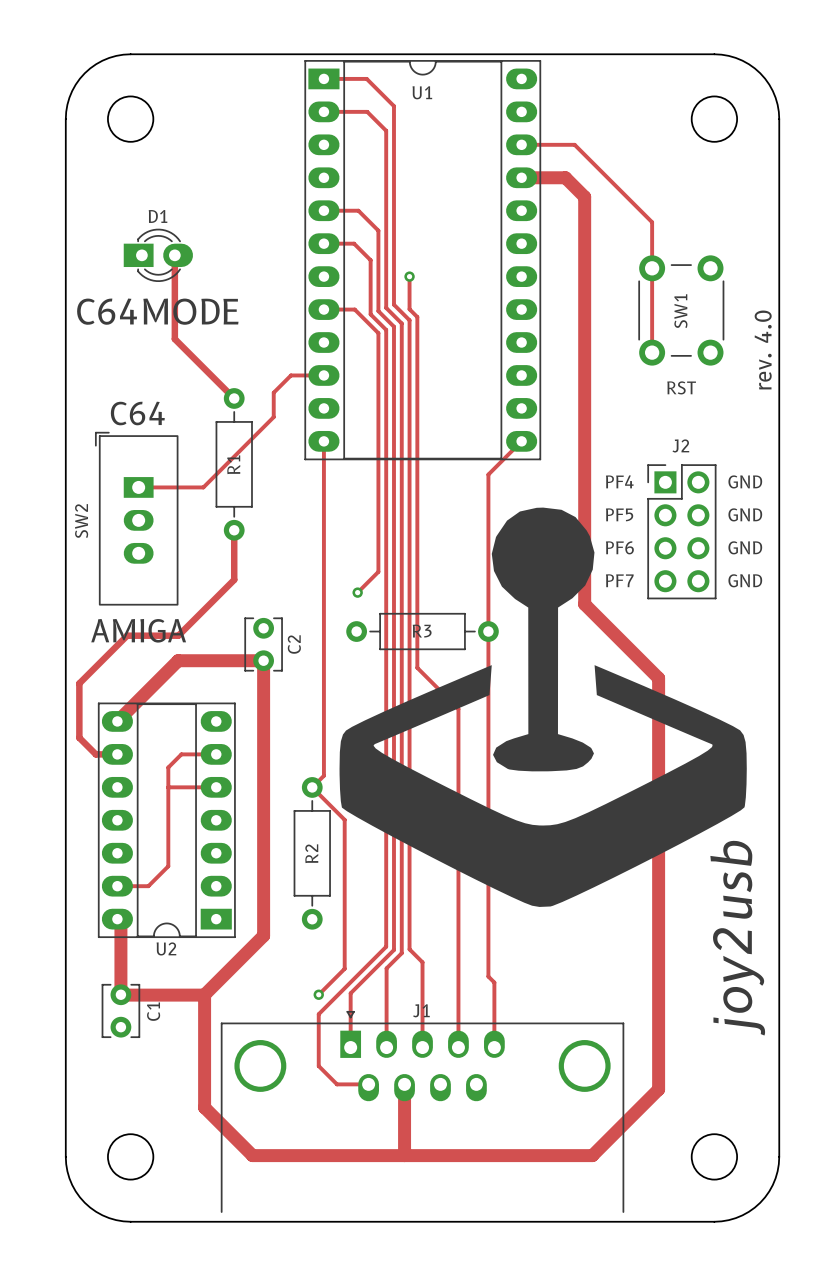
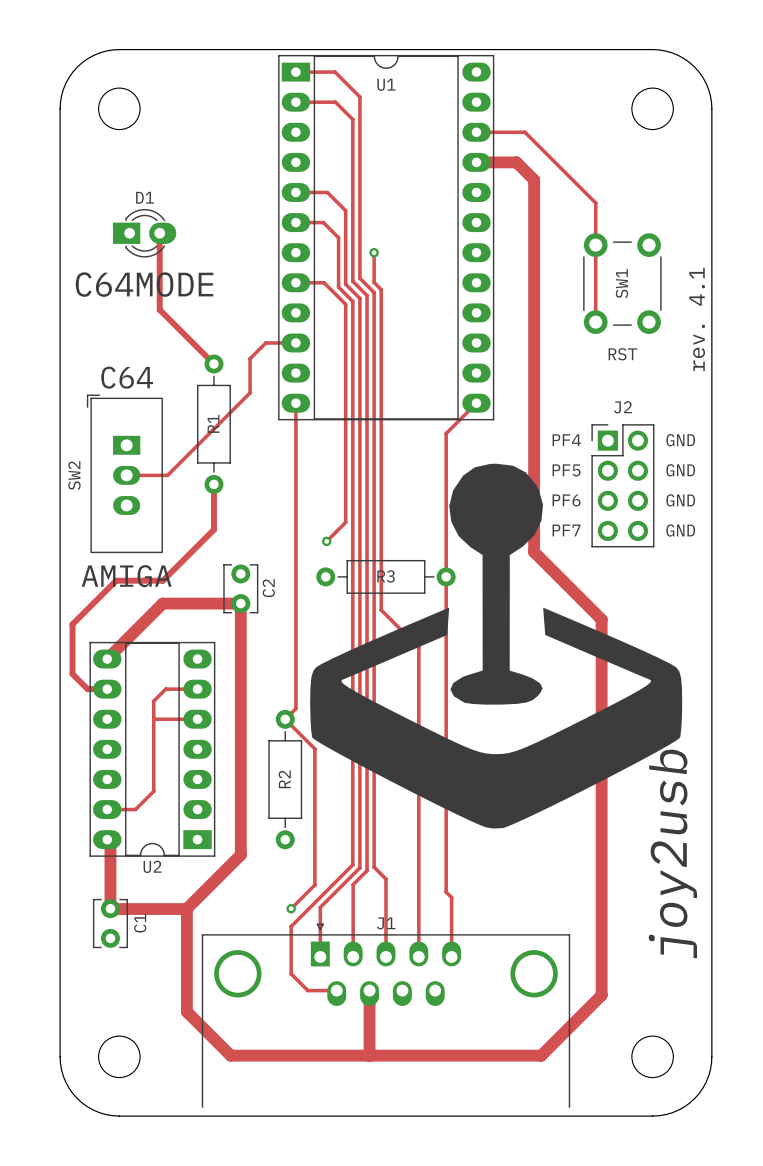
text: rev. 4.0 (763, 349) -> rev. 4.1 (697, 319)
track: (273, 417) (203, 487) (138, 487) -> (250, 381) (250, 392) (167, 475) (126, 475)

